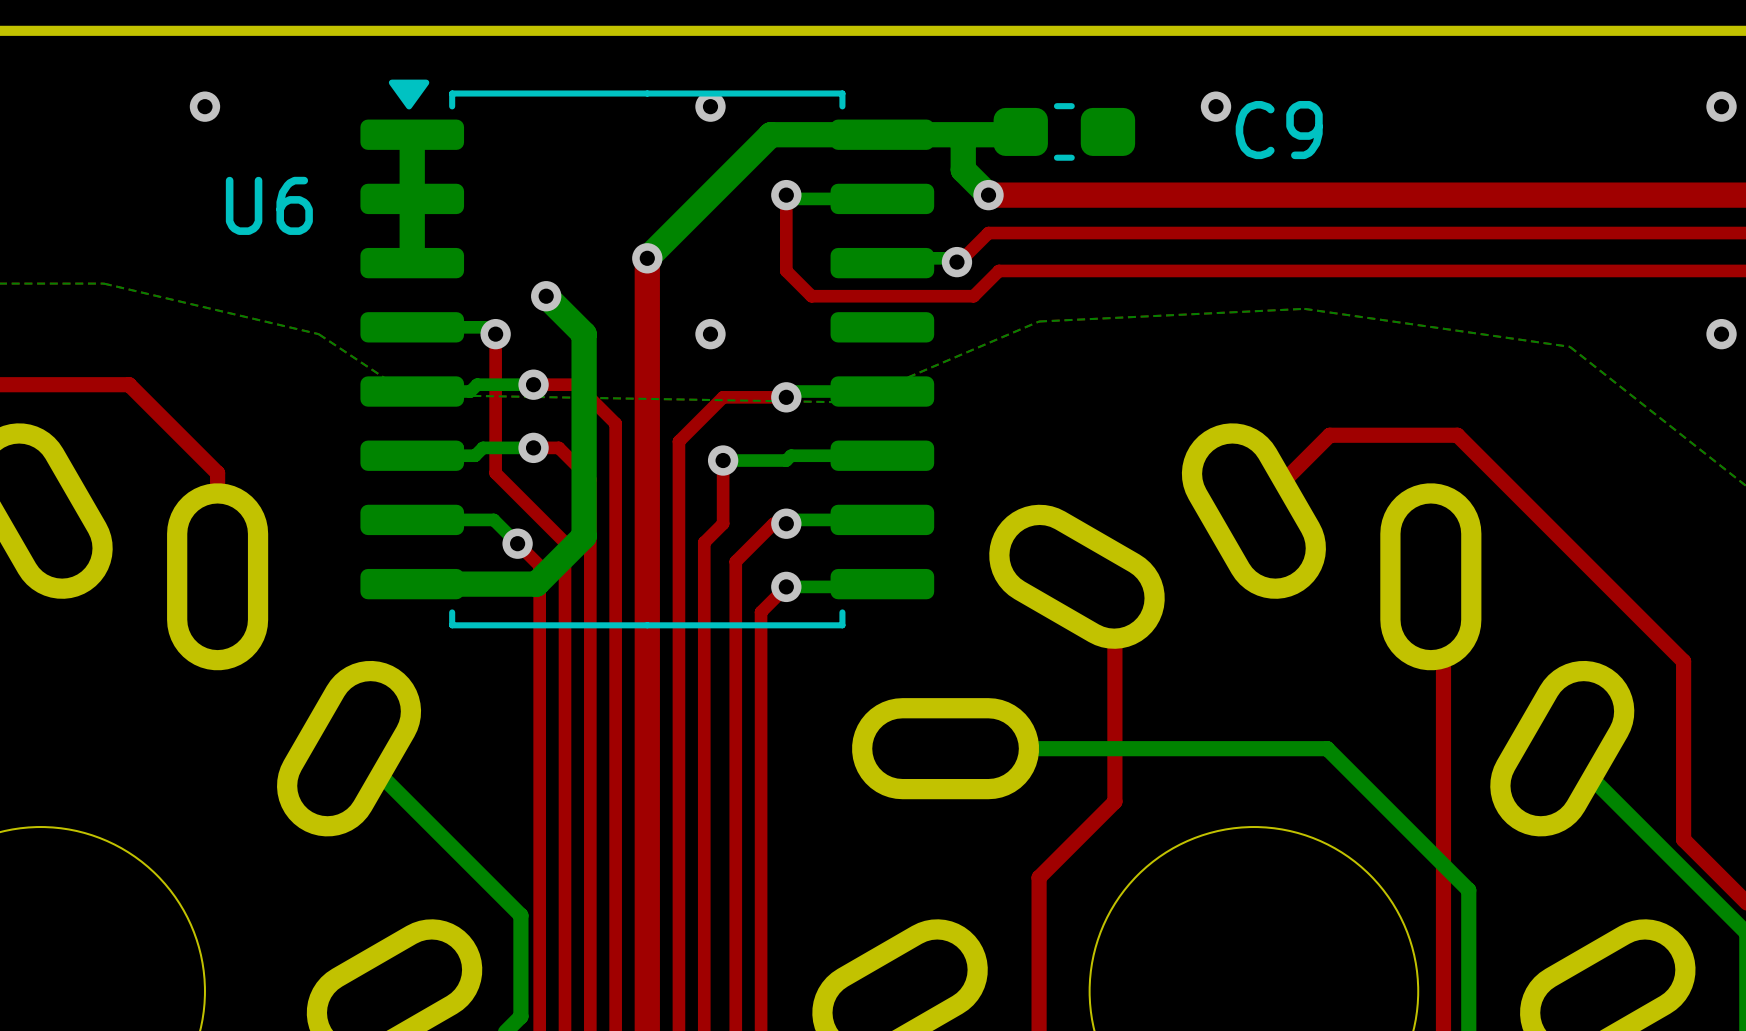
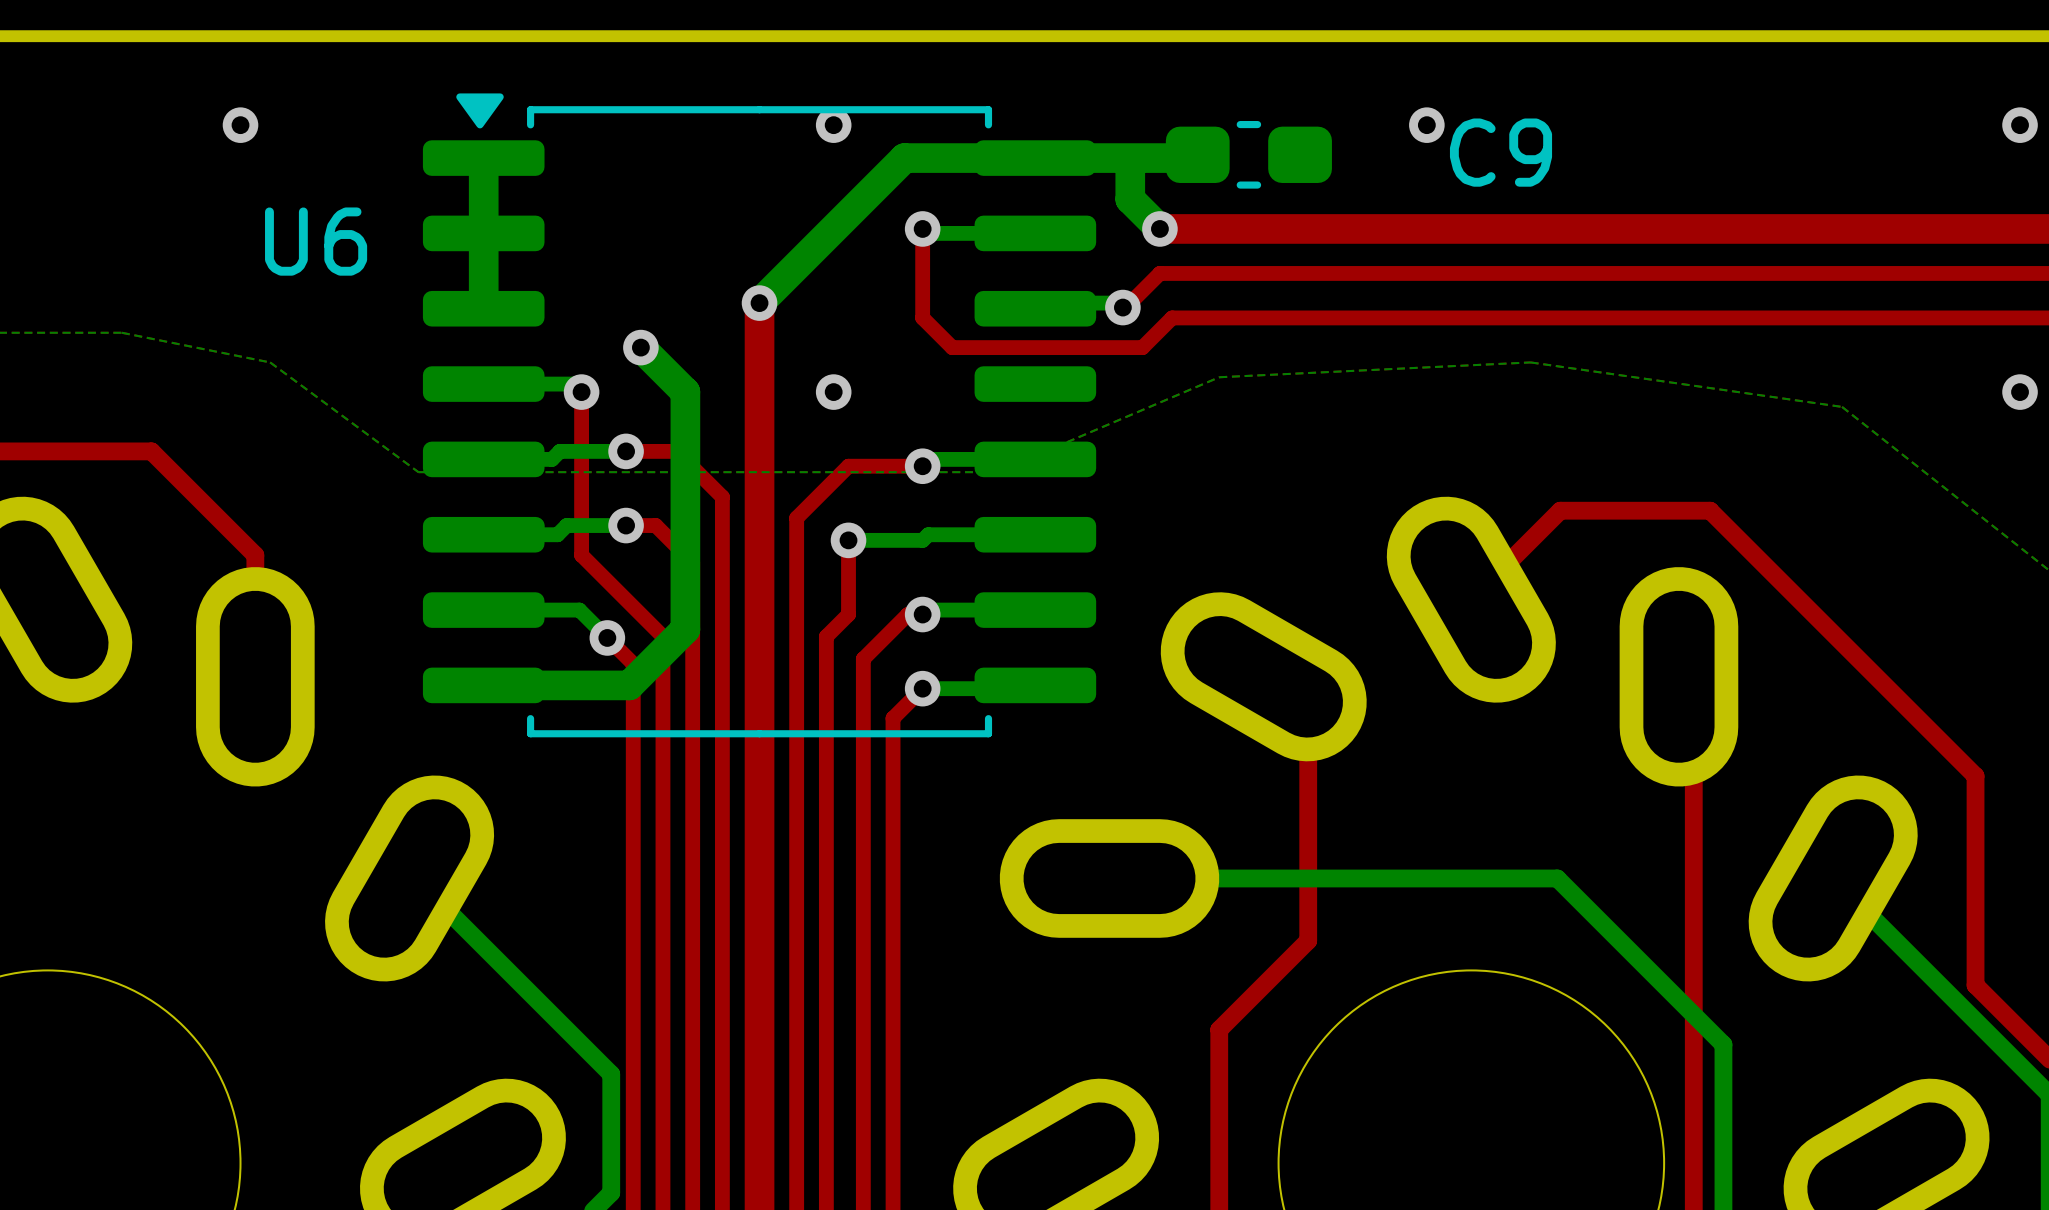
bottom zone outline: (103, 283) (318, 334) (409, 394) (849, 402) -> (121, 332) (270, 362) (418, 472) (996, 472)

